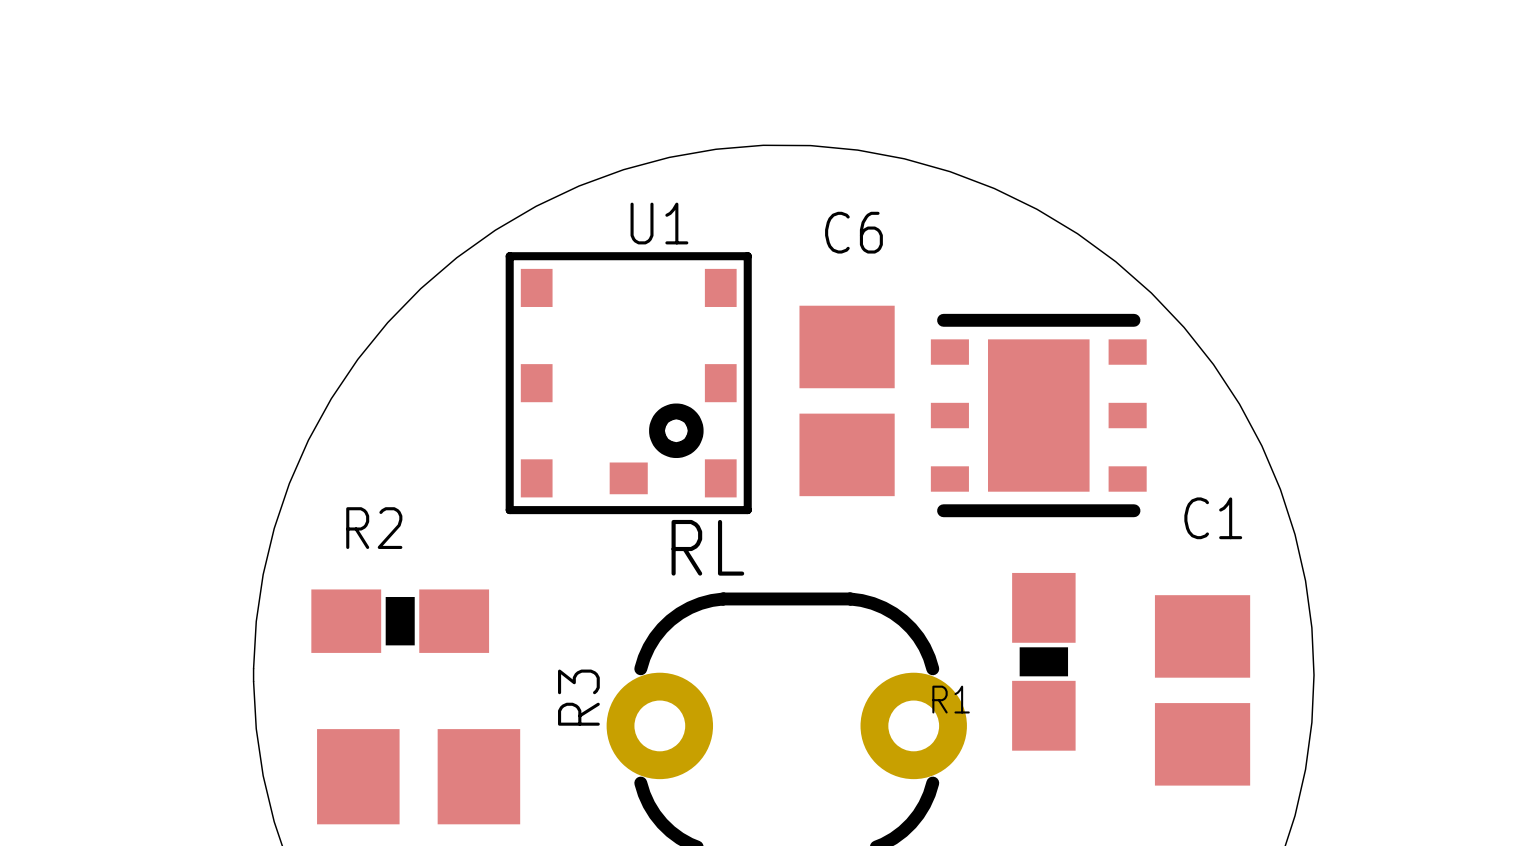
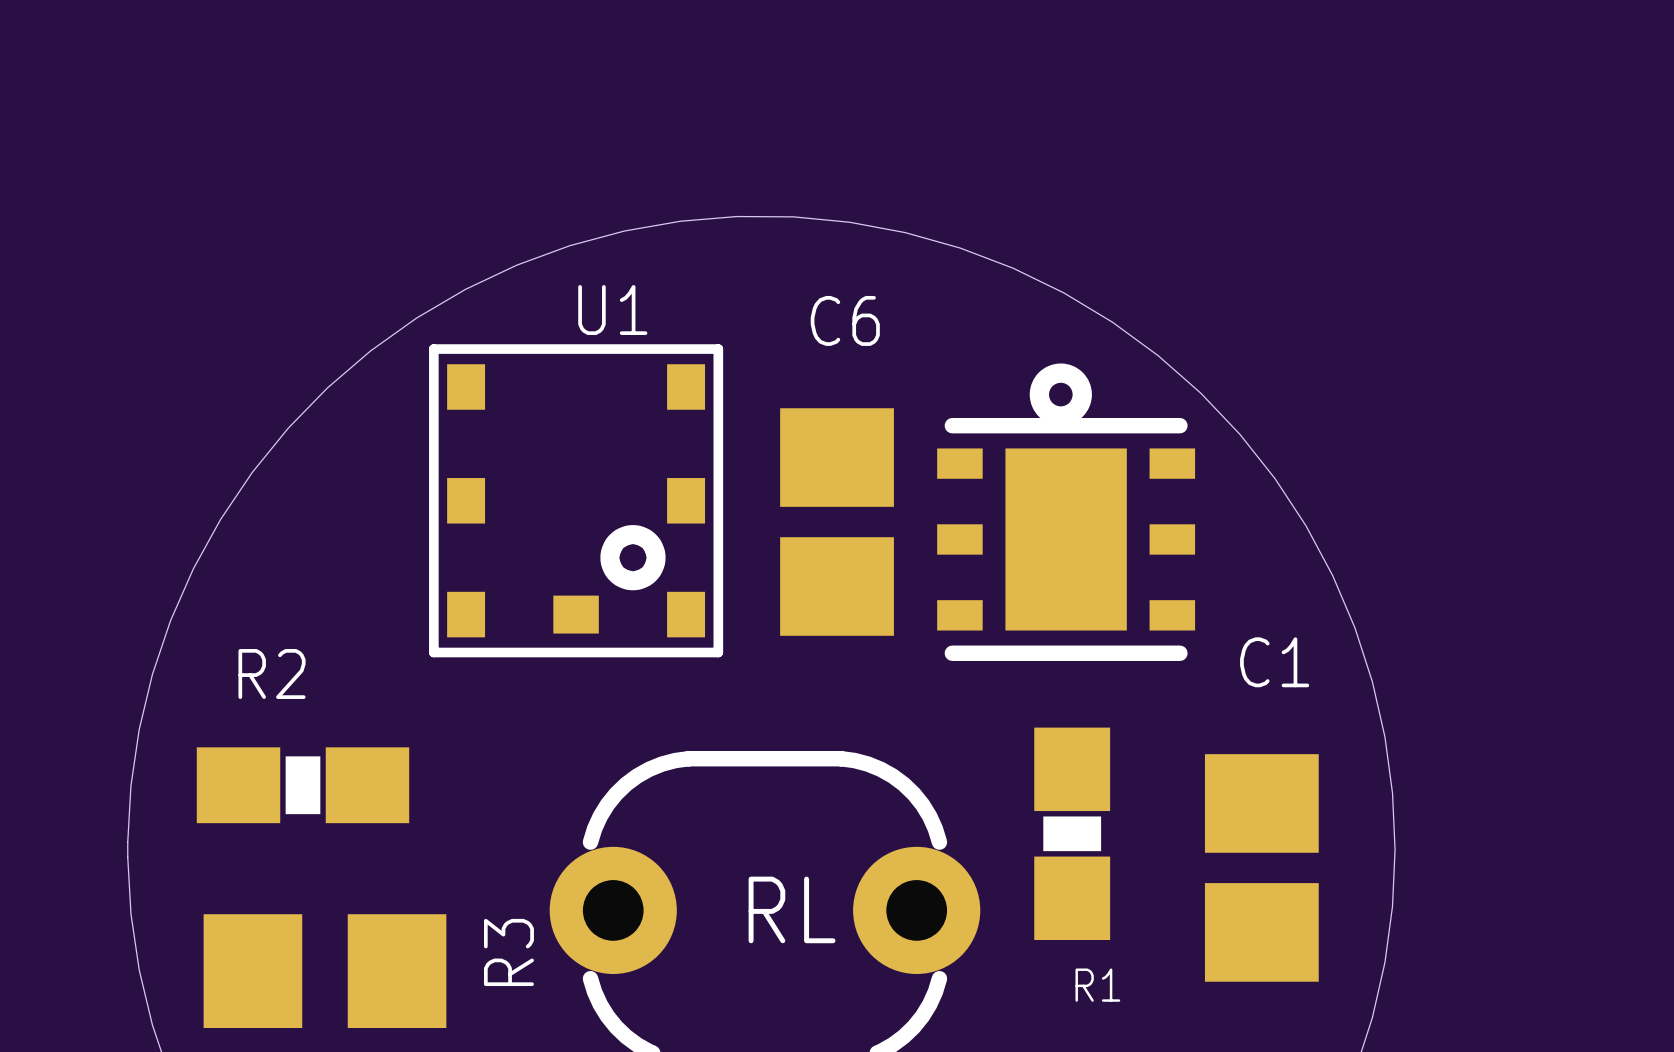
drawing: none -> [1029, 363, 1092, 426]
RL name position: RL (707, 547) -> RL (792, 909)
R3 name position: R3 (578, 697) -> R3 (508, 952)
R1 name position: R1 (951, 699) -> R1 (1097, 985)

